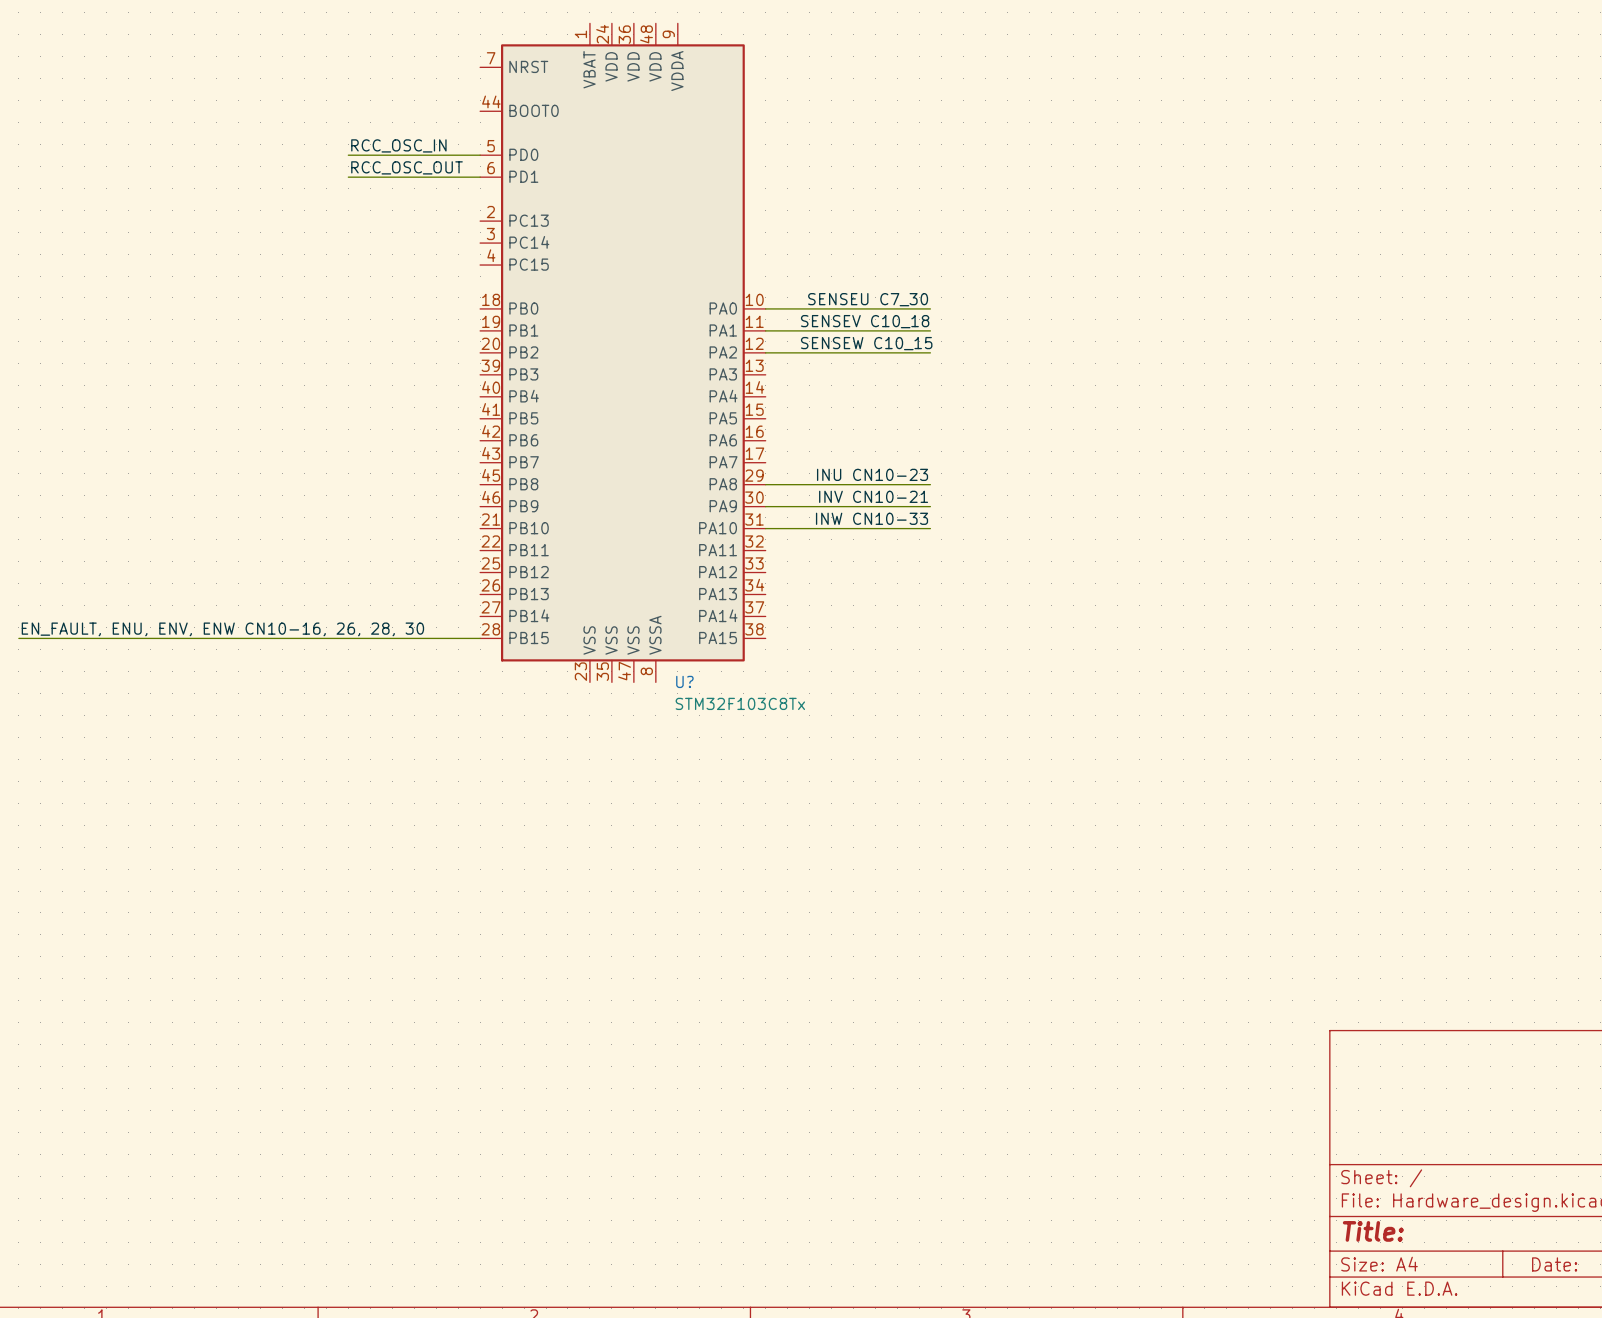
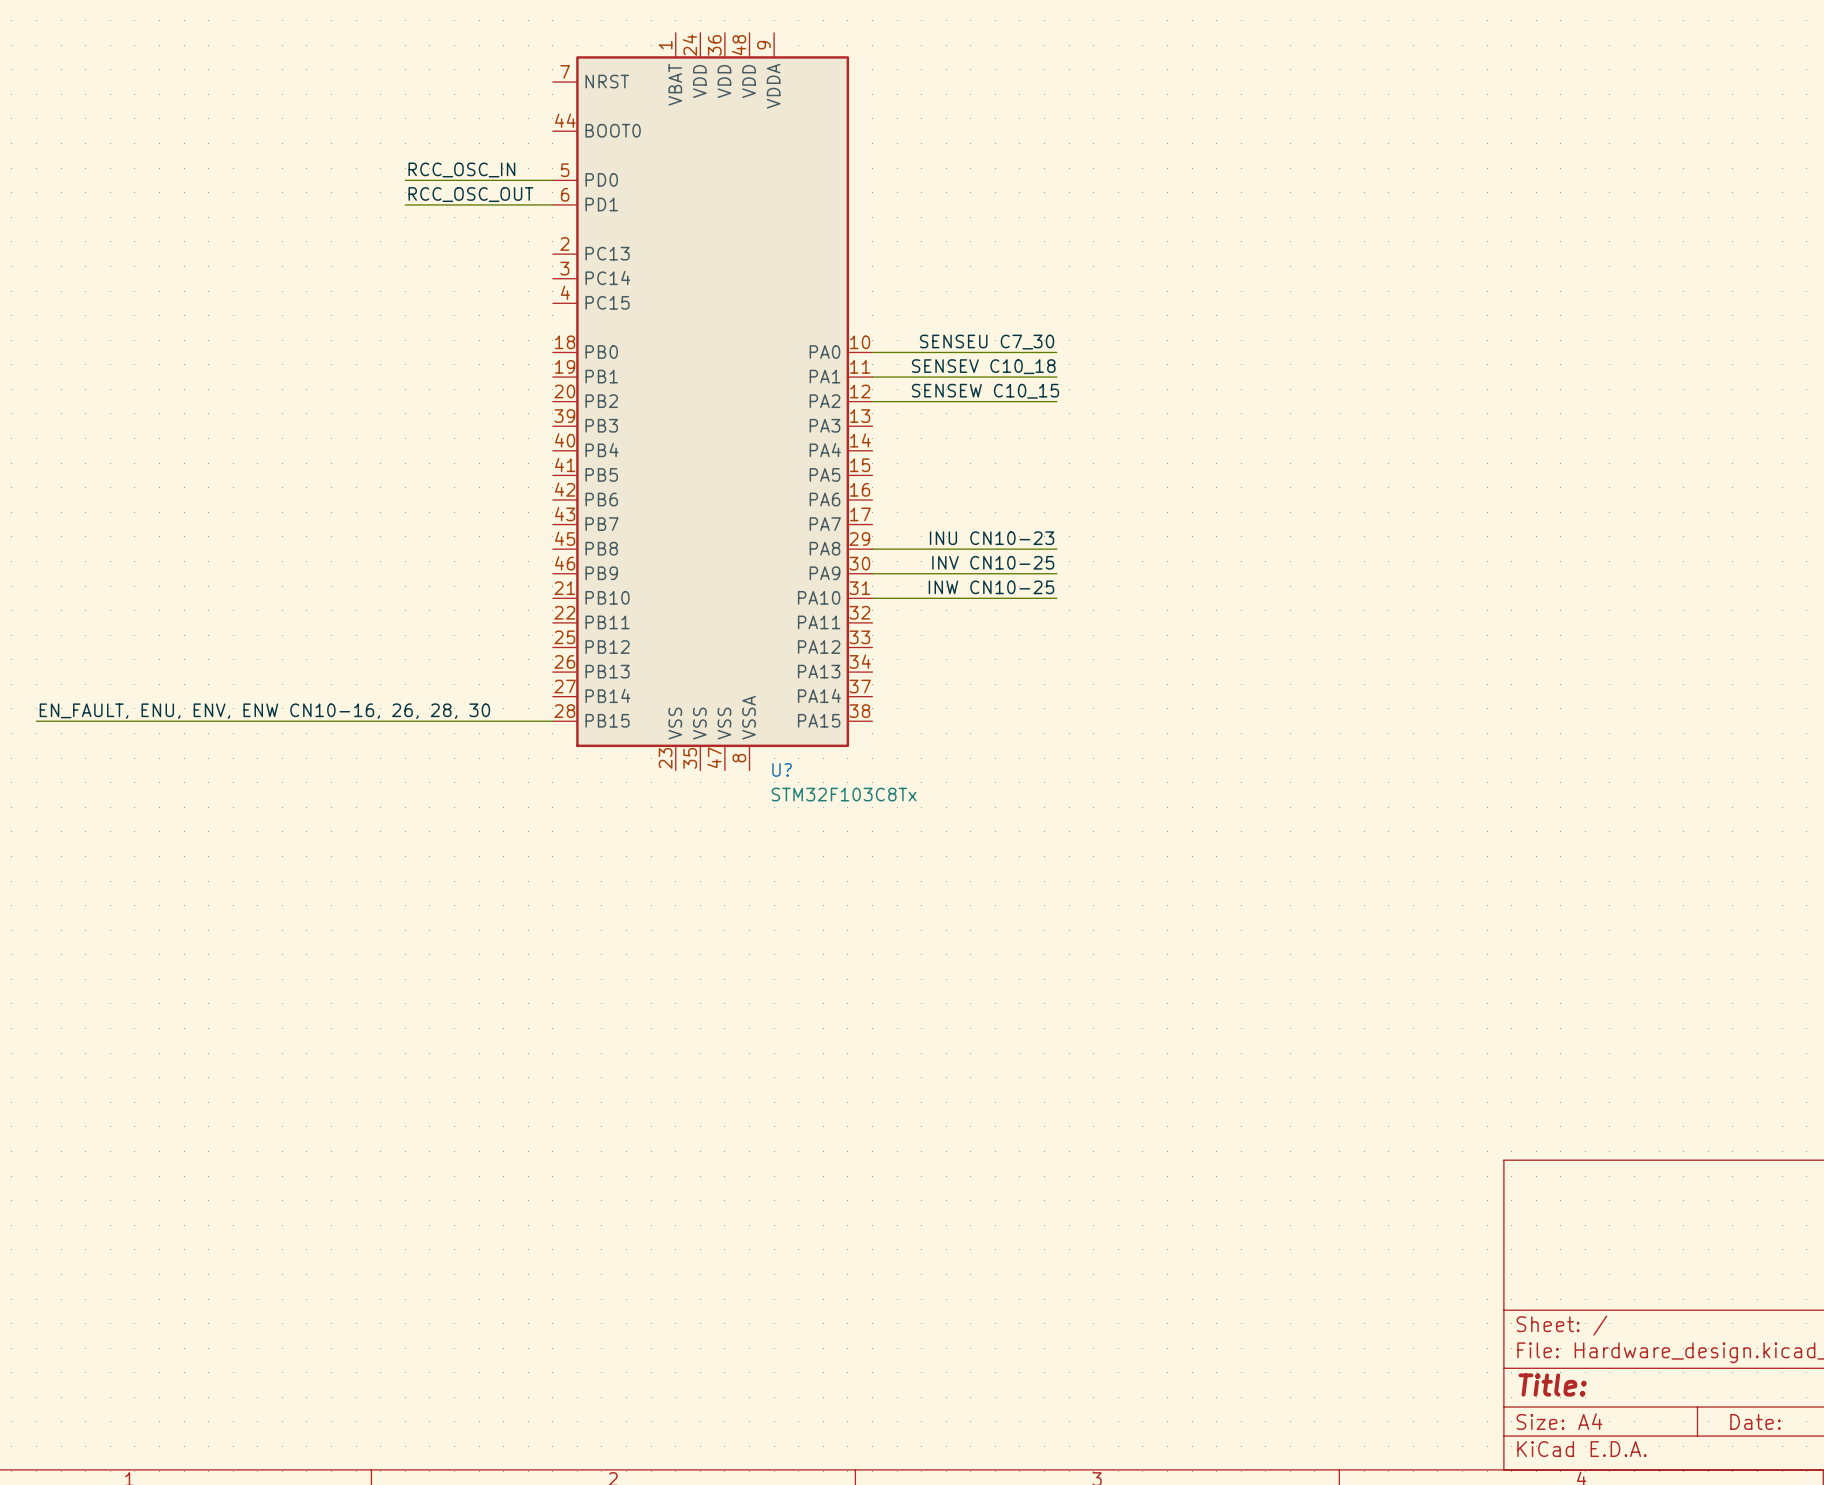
label: INV CN10-21 (873, 496) -> INV CN10-25 (993, 562)
label: INW CN10-33 (872, 518) -> INW CN10-25 (991, 587)

